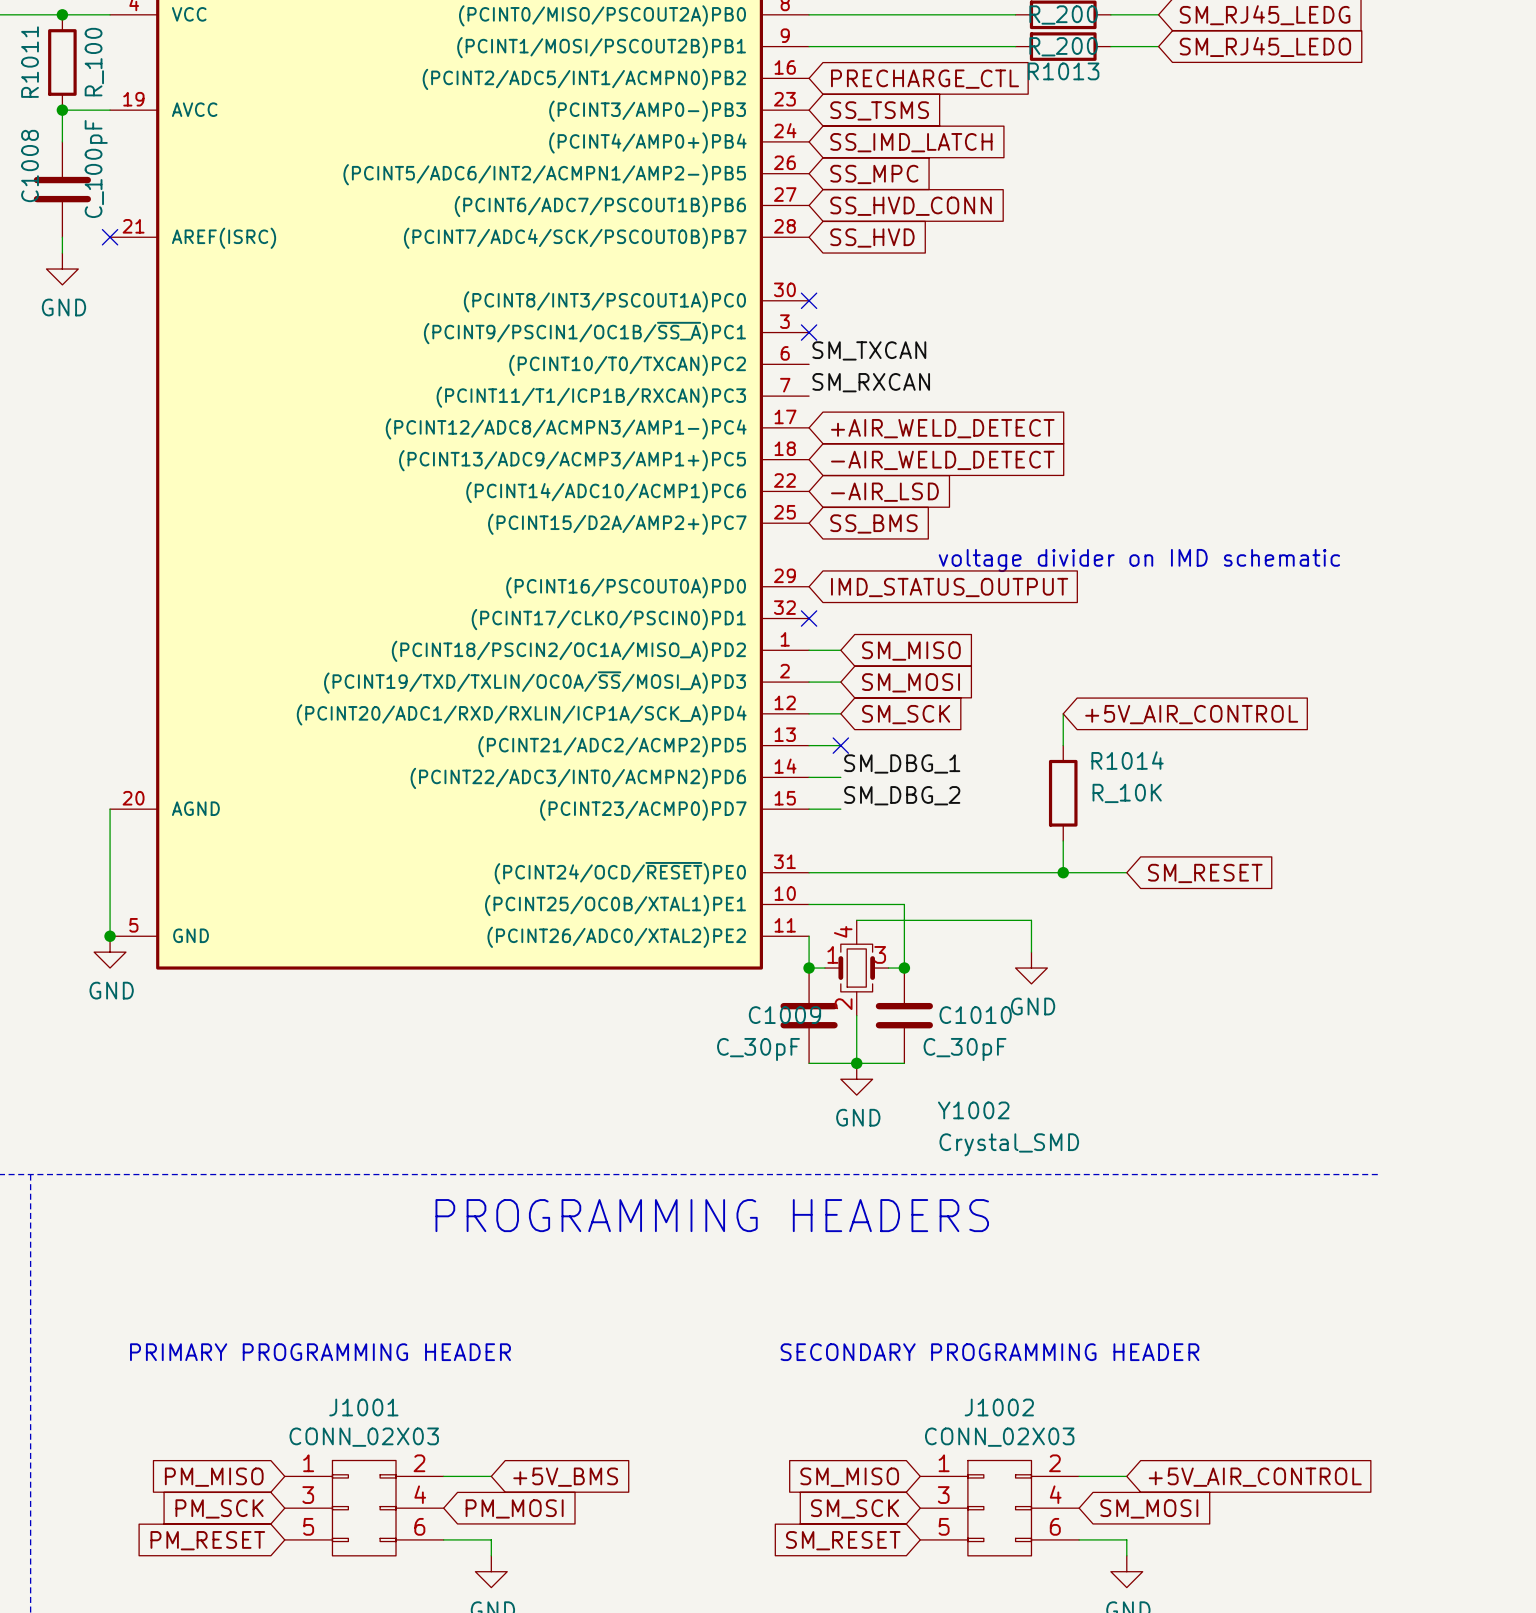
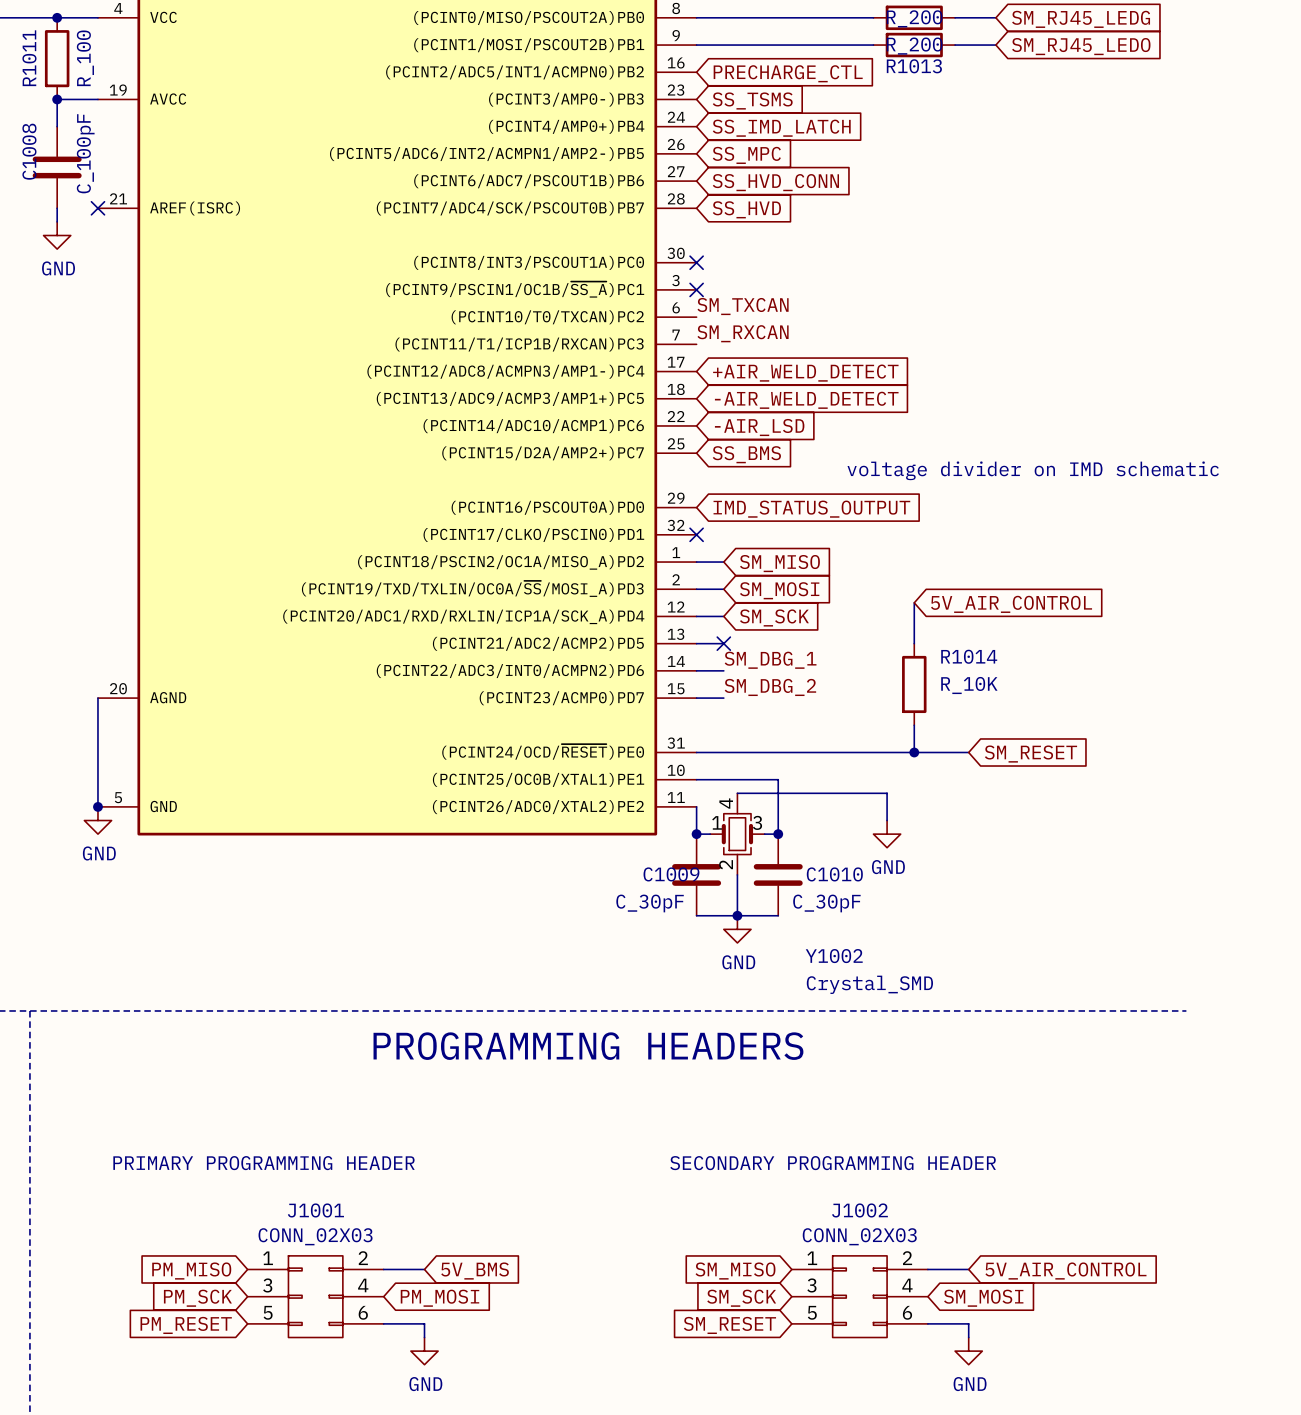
text position: voltage divider on IMD schematic (1139, 560) -> voltage divider on IMD schematic (1033, 470)
wire: none -> (914, 602) (914, 616)
global label: +5V_AIR_CONTROL (1191, 714) -> 5V_AIR_CONTROL (1011, 604)
global label: +5V_BMS (565, 1477) -> 5V_BMS (475, 1271)
global label: +5V_AIR_CONTROL (1255, 1477) -> 5V_AIR_CONTROL (1065, 1271)

